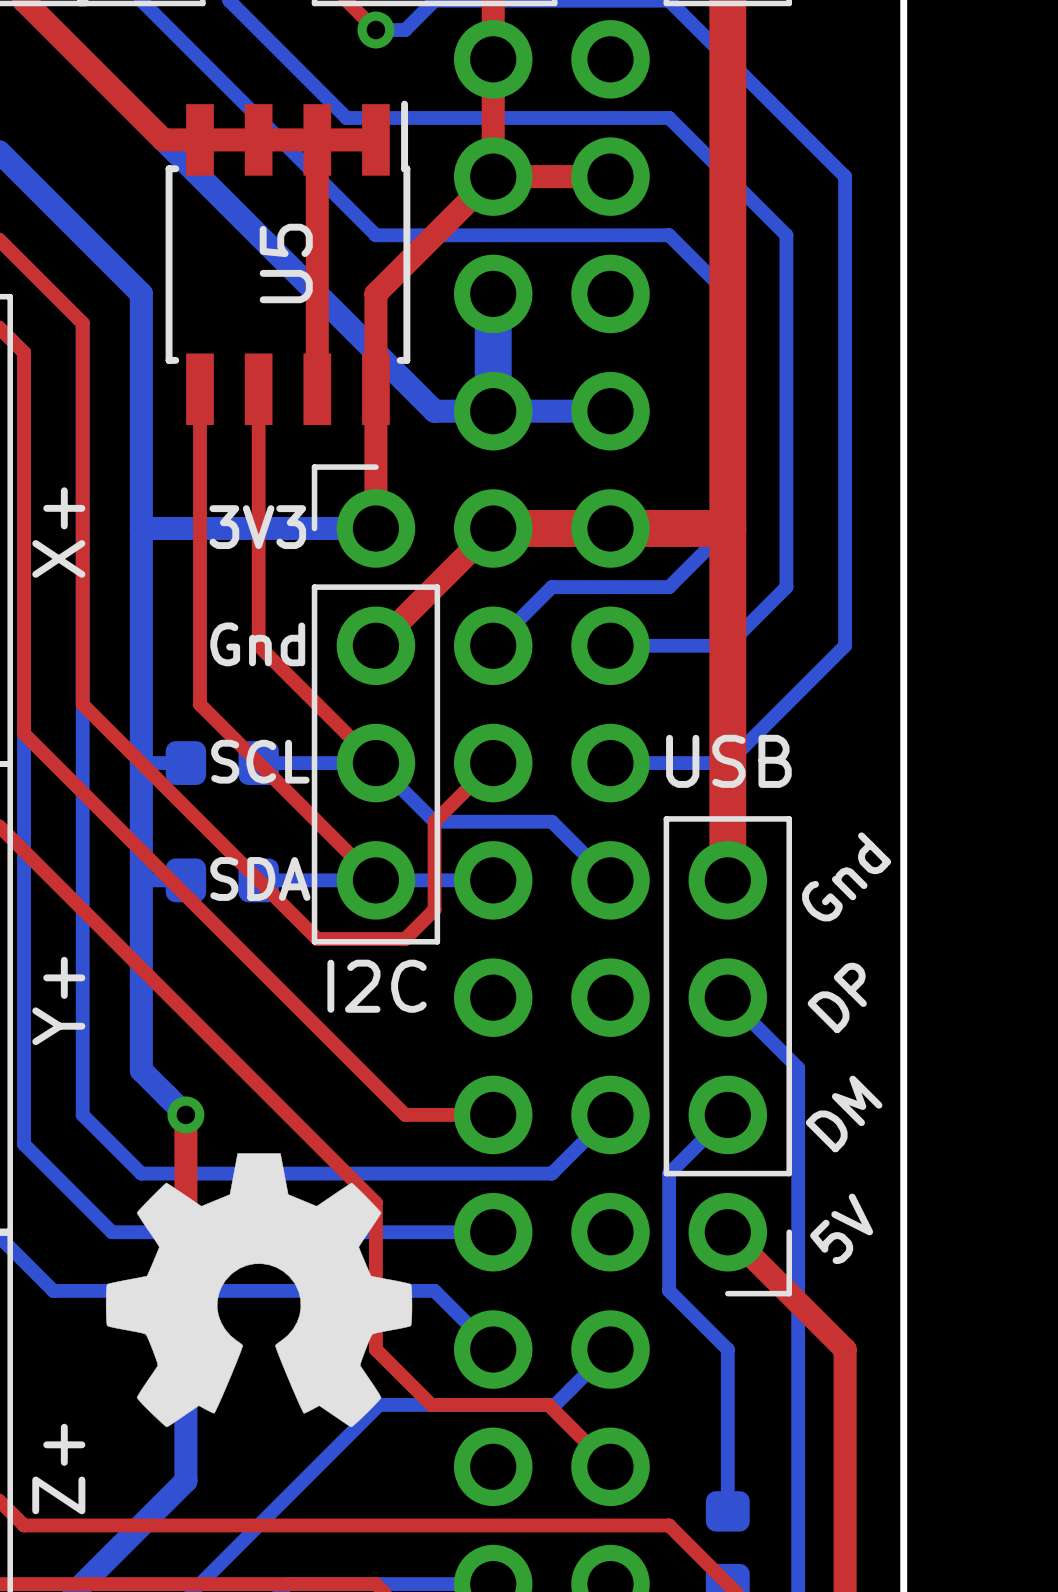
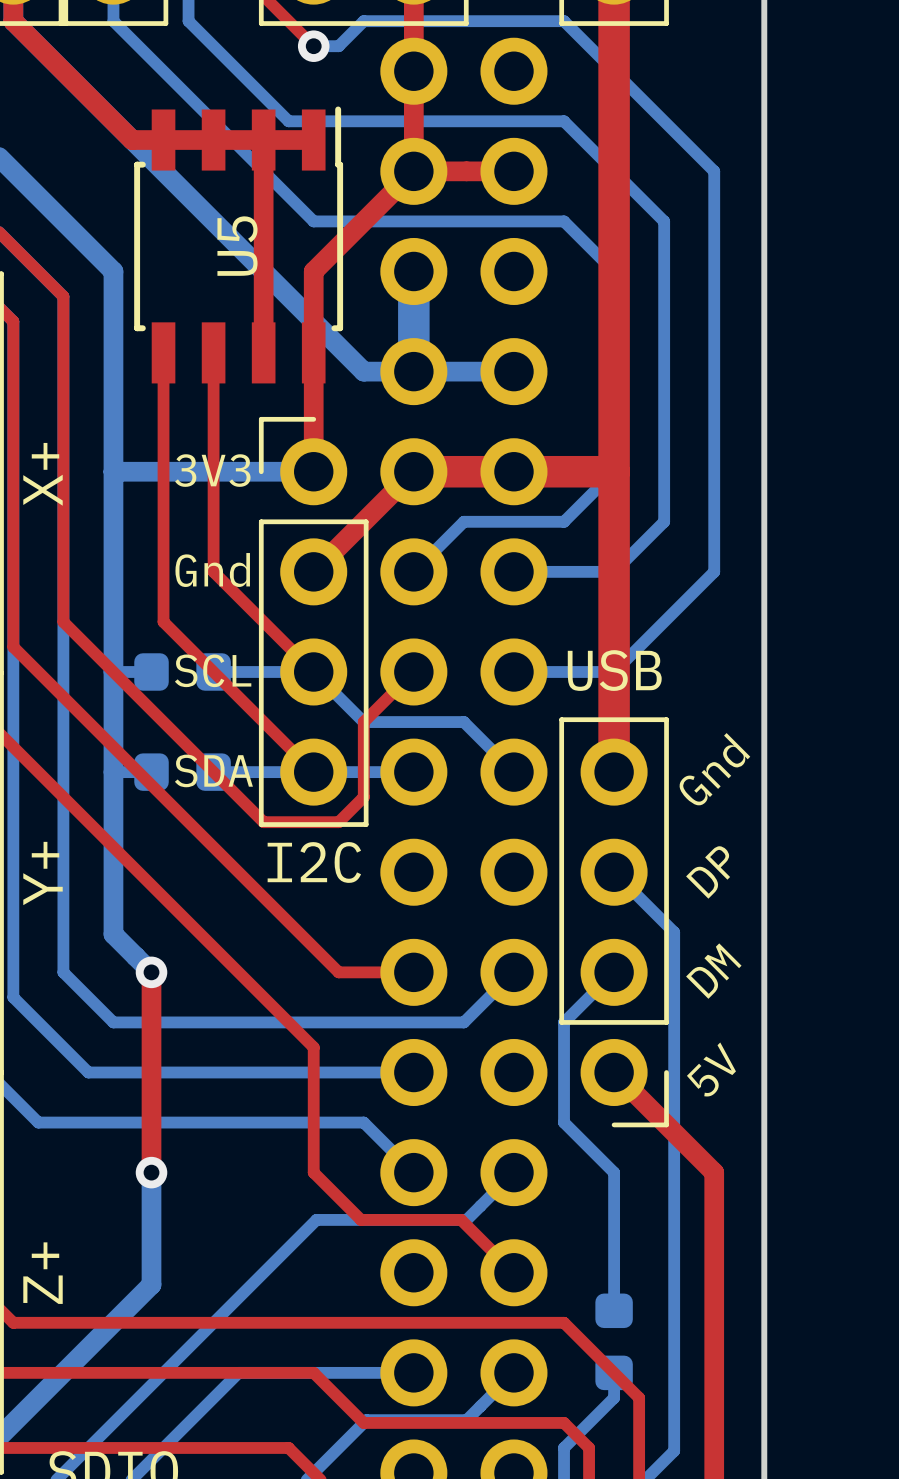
drawing: [105, 1153, 413, 1428] -> none

